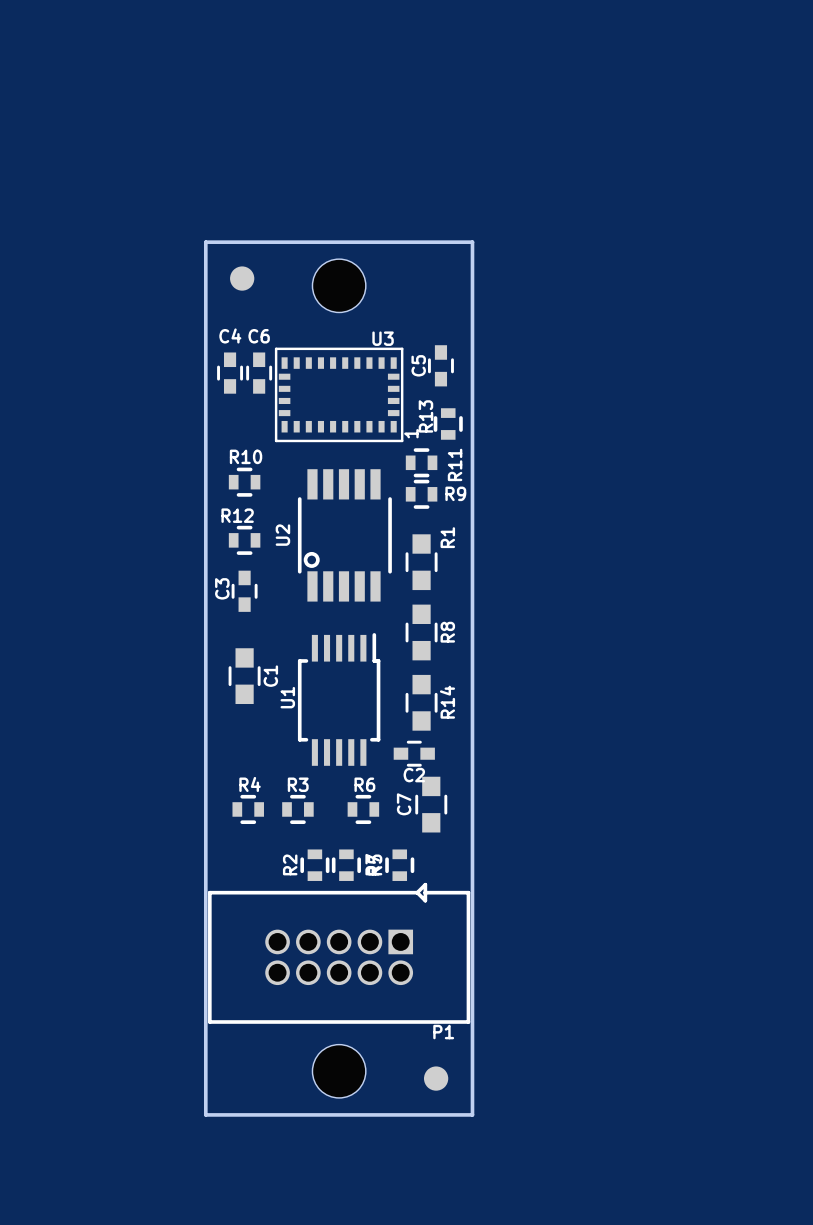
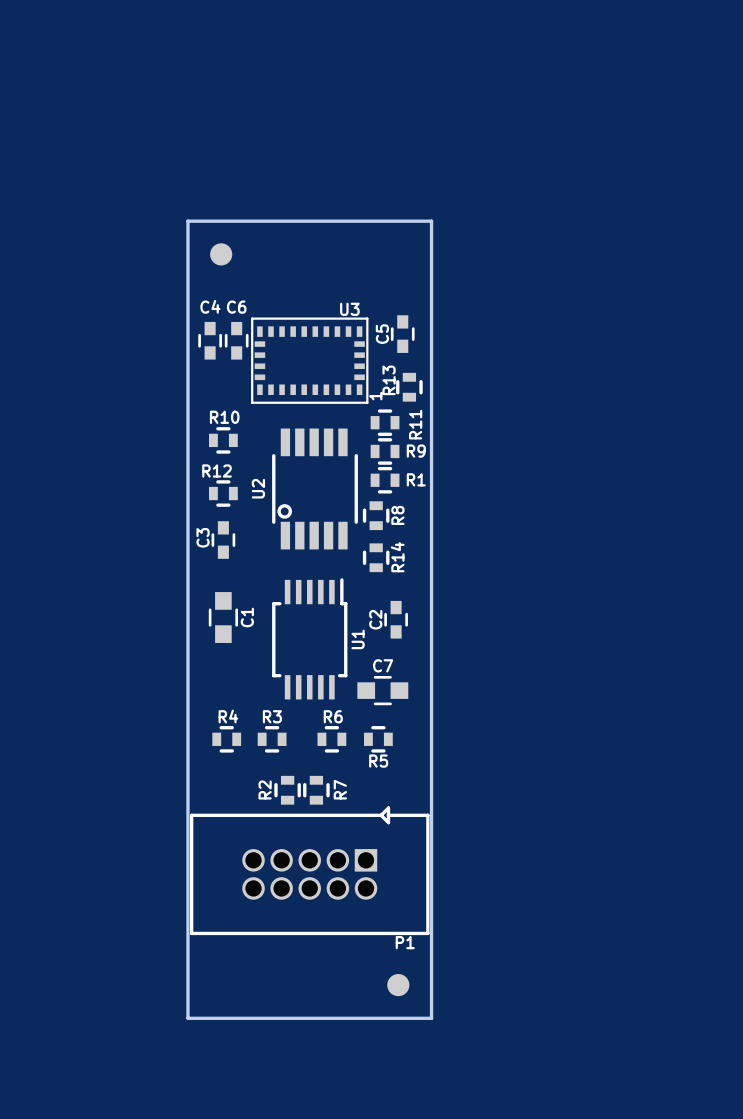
part: (339, 285) -> none
R1 footprint: [405, 534, 438, 591] -> [370, 466, 400, 494]
R8 footprint: [405, 604, 438, 661] -> [362, 501, 390, 531]
R14 footprint: [405, 674, 438, 731] -> [362, 543, 390, 573]
U1 name position: U1 (287, 697) -> U1 (358, 639)
C2 rotation: 0° (414, 753) -> 90° clockwise (396, 619)
C2 position: (414, 753) -> (396, 619)
C7 rotation: 0° (431, 804) -> 90° clockwise (382, 690)
C7 position: (431, 804) -> (382, 690)
R5 rotation: 0° (399, 865) -> 90° clockwise (378, 739)
R5 position: (399, 865) -> (378, 739)
part: (339, 1071) -> none

